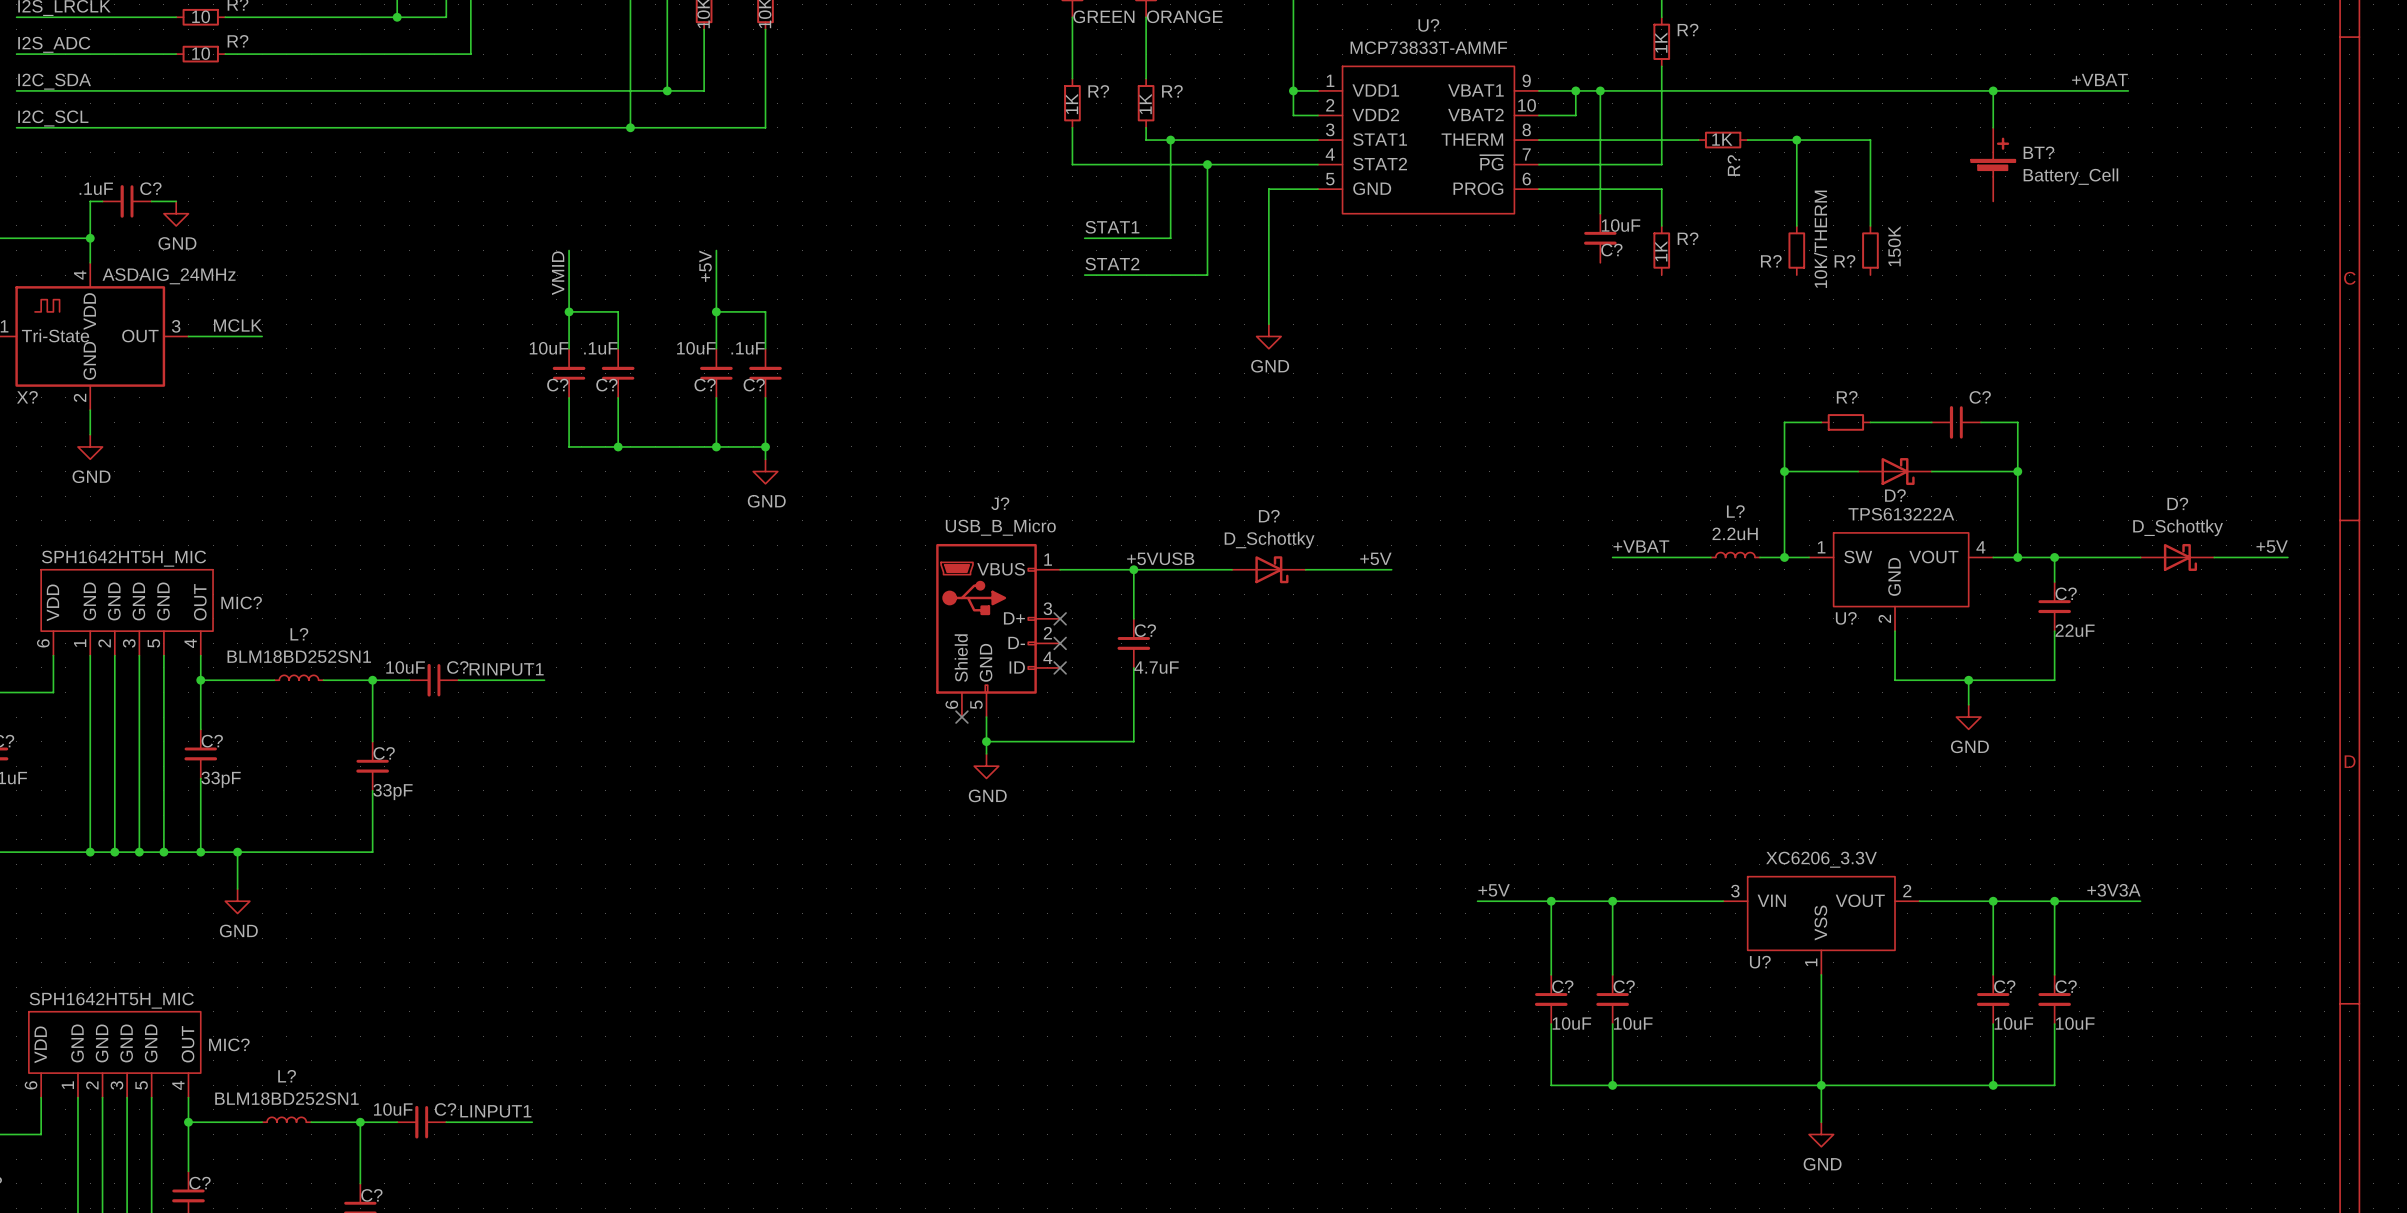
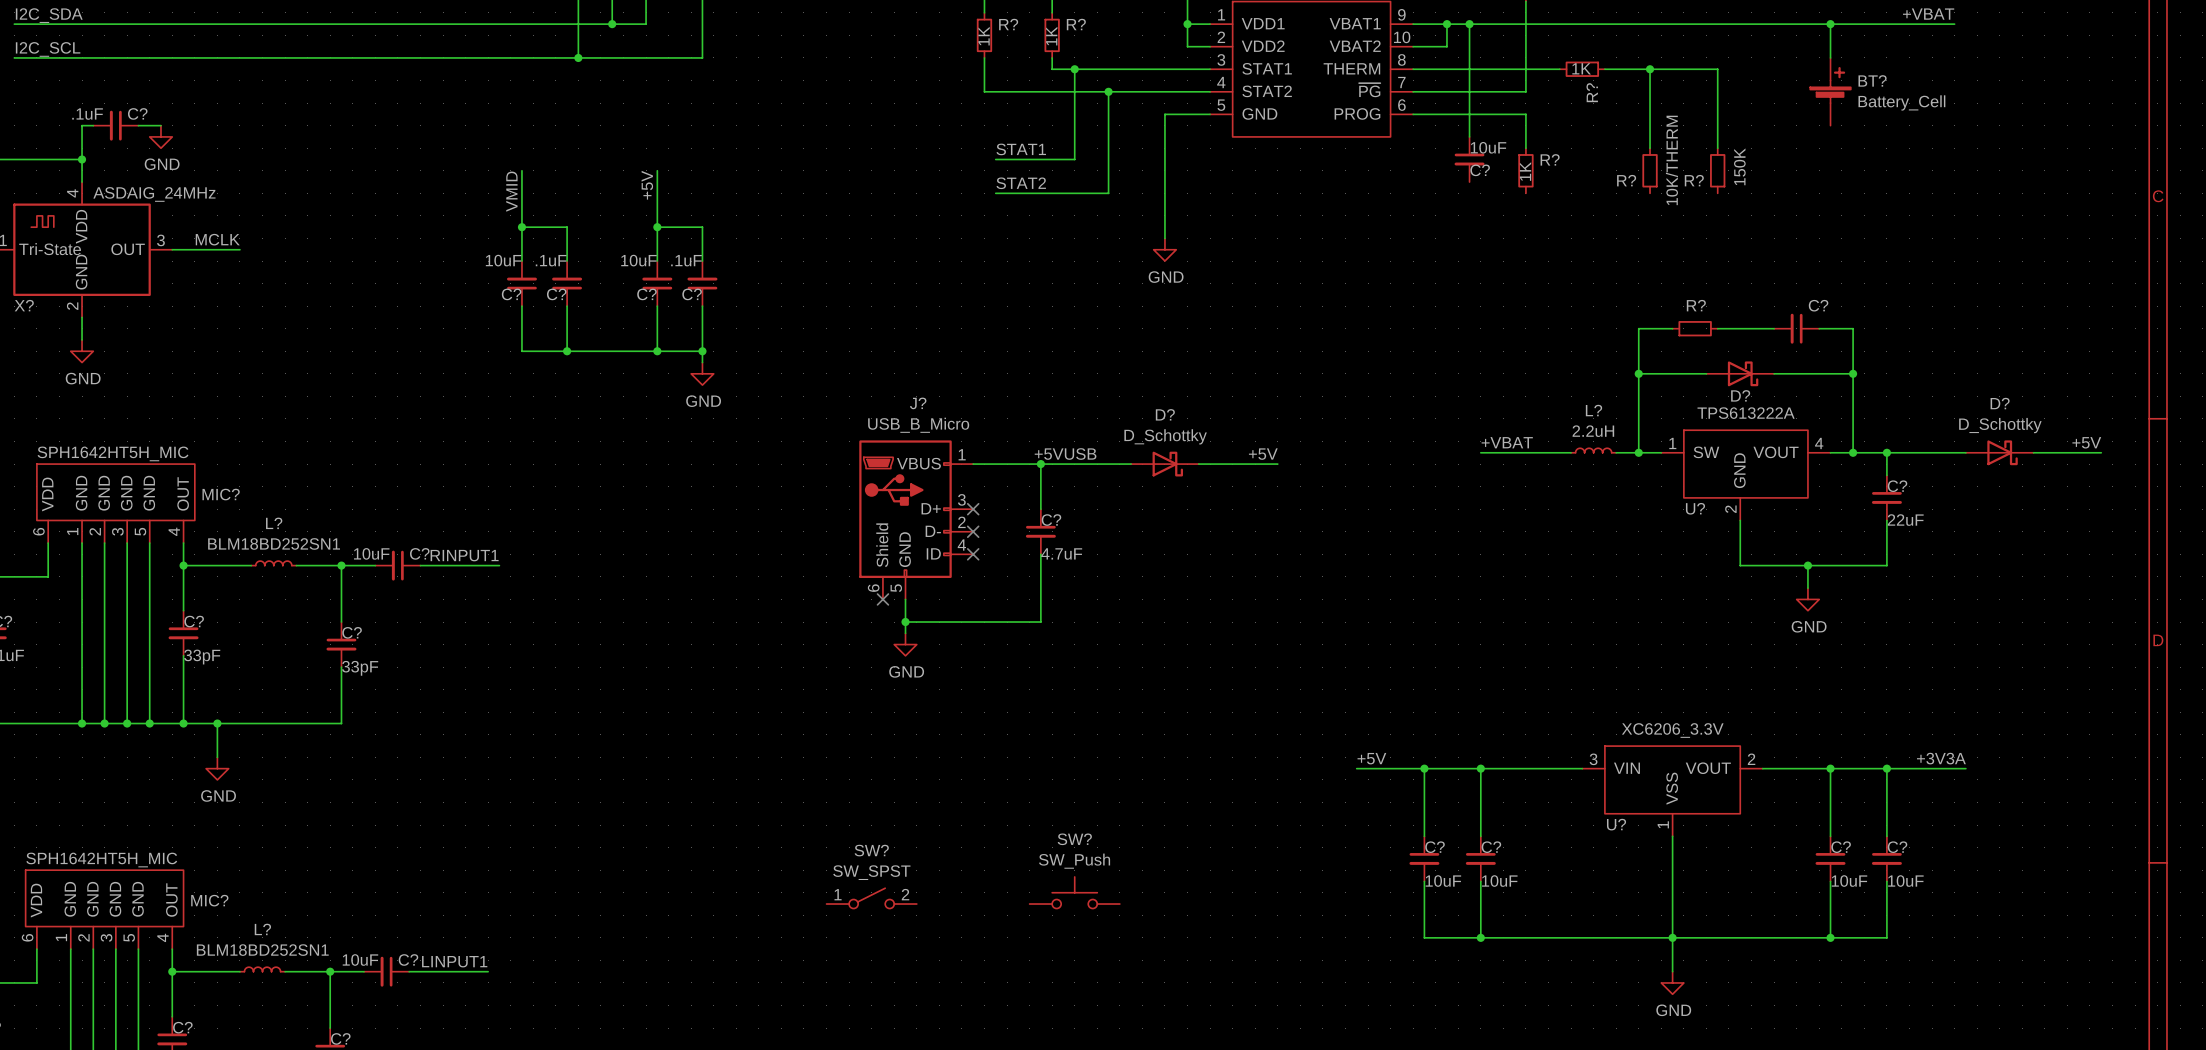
SW?: none -> SW_Push (1074, 892)
SW?: none -> SW_SPST (871, 898)

